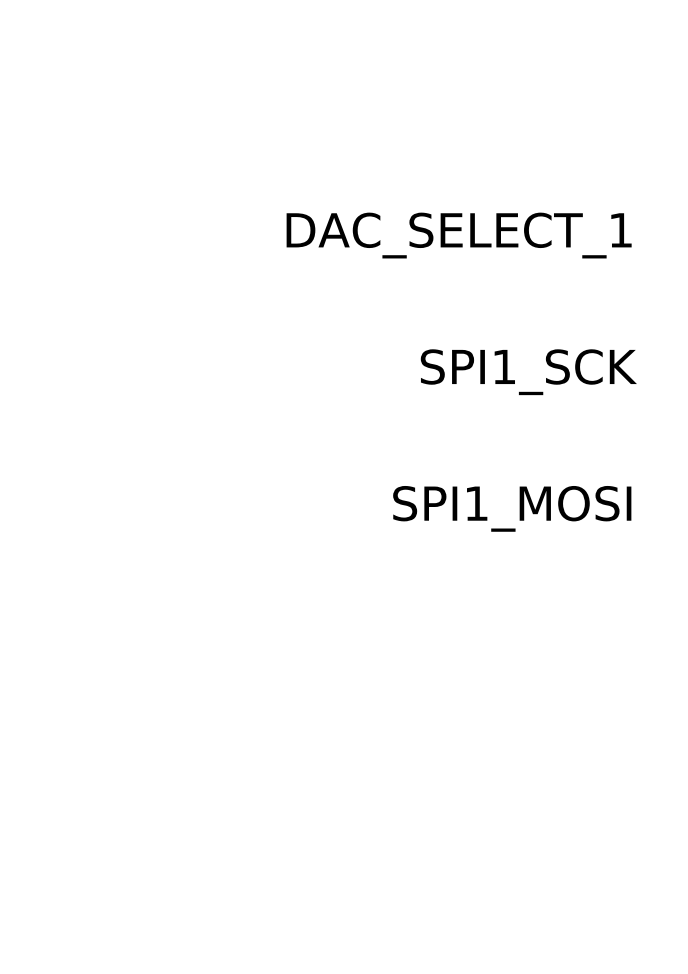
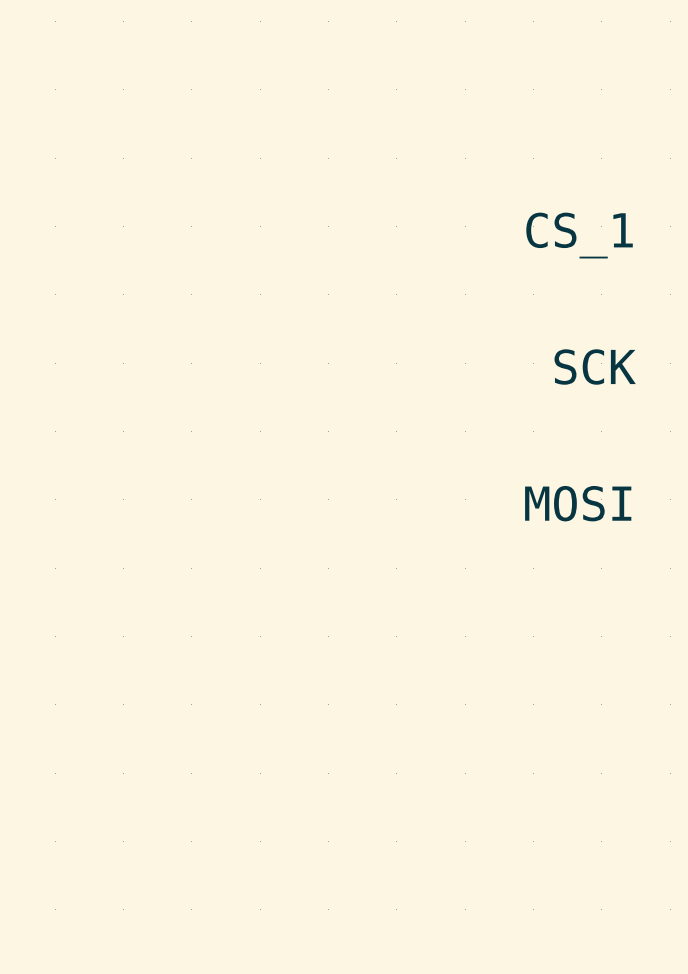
label: DAC_SELECT_1 (459, 235) -> CS_1 (579, 235)
label: SPI1_SCK (528, 372) -> SCK (595, 367)
label: SPI1_MOSI (512, 508) -> MOSI (578, 503)

